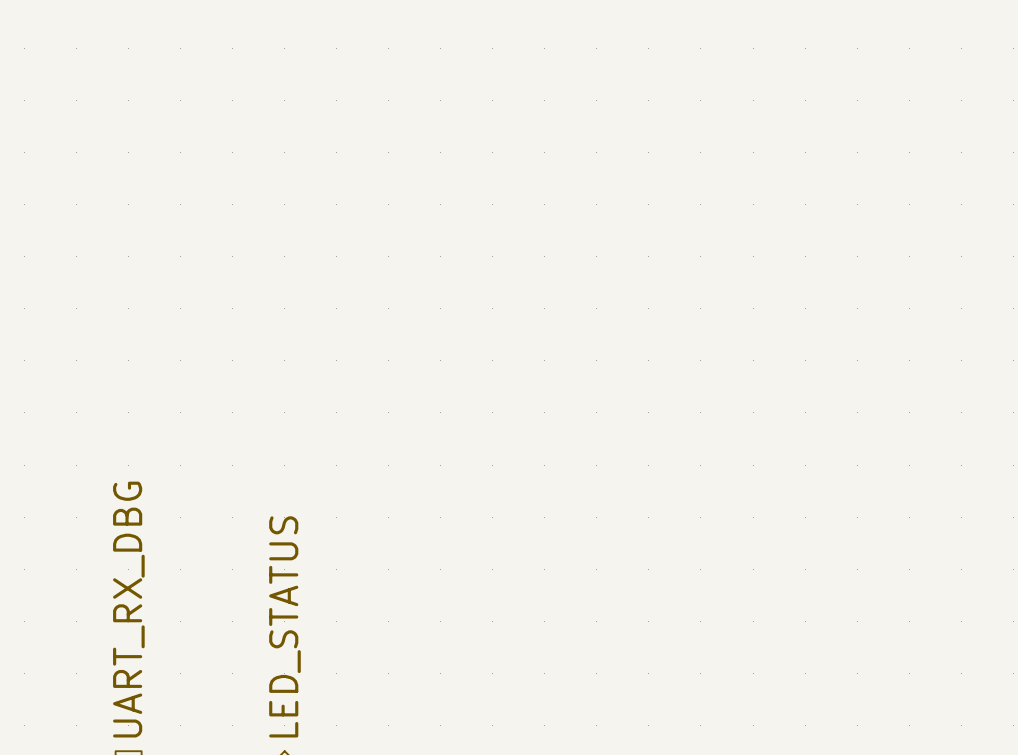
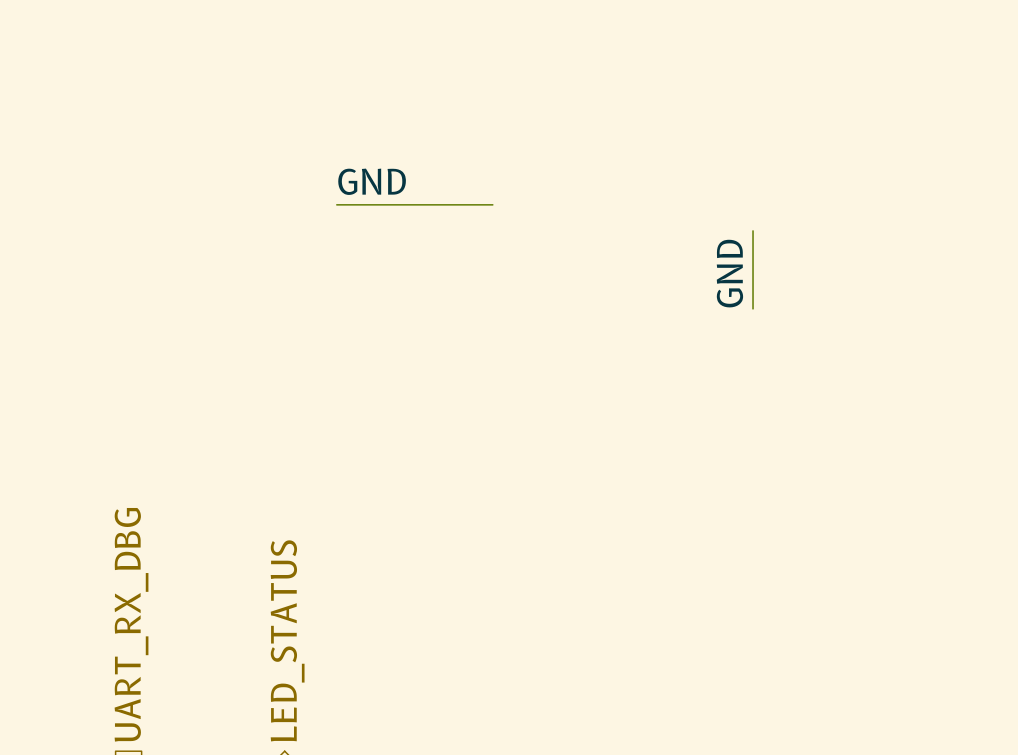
label: none -> GND (372, 181)
wire: none -> (336, 204) (492, 204)
wire: none -> (753, 230) (753, 308)
label: none -> GND (729, 273)

